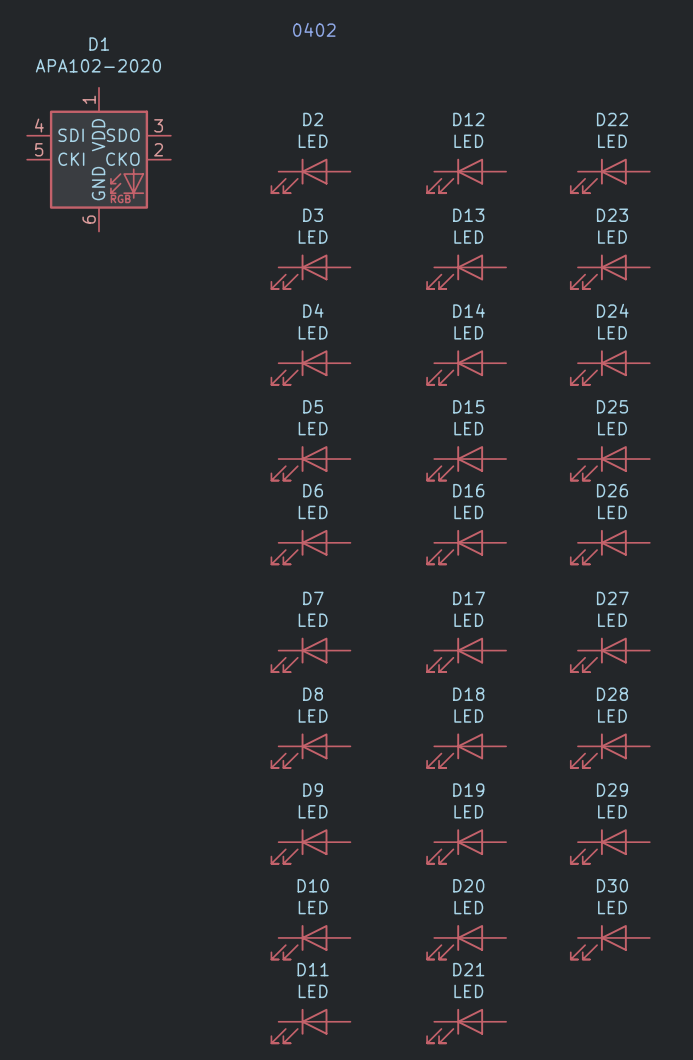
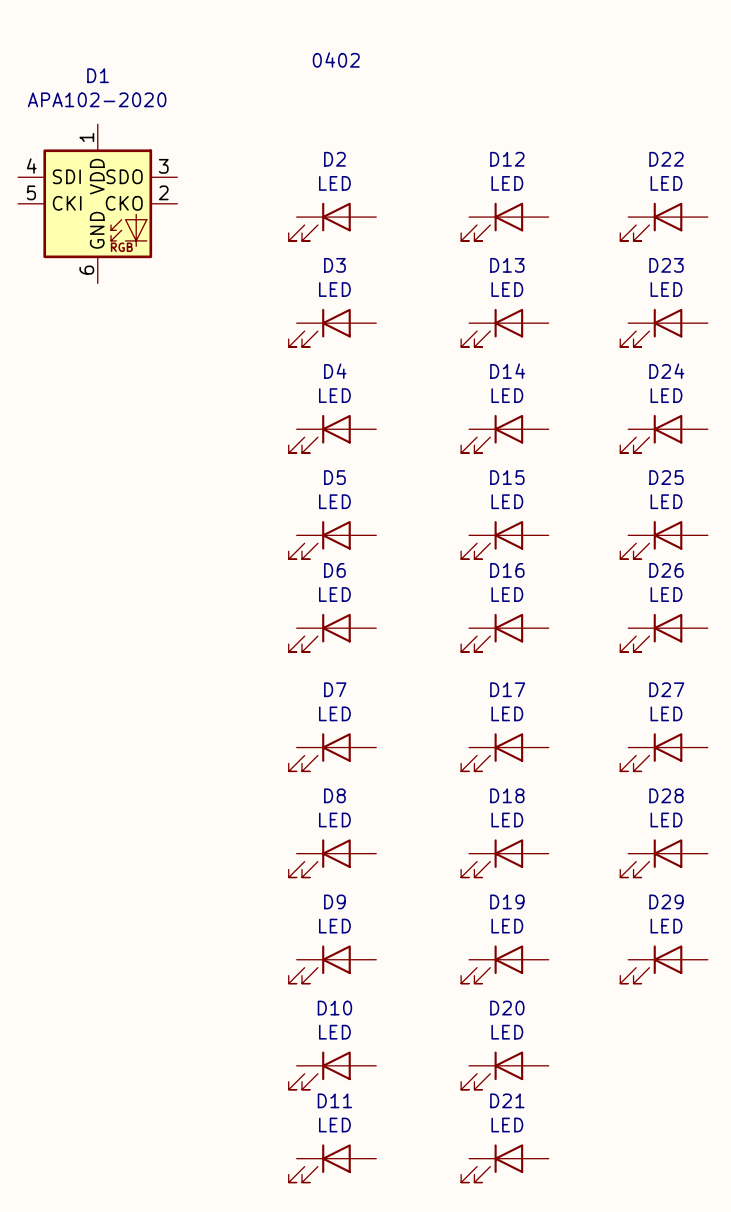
D30: LED (610, 942) -> none

